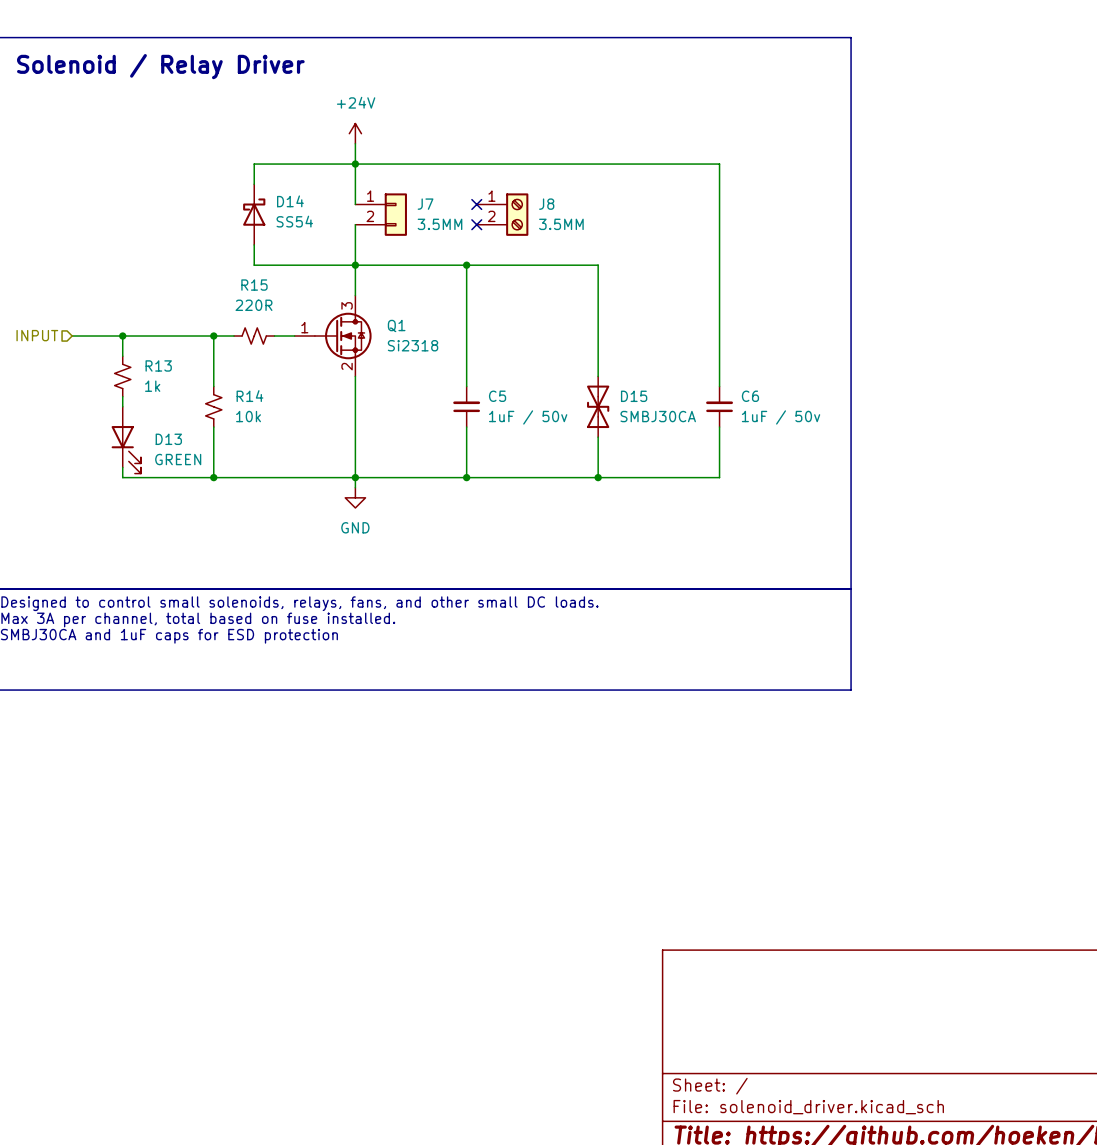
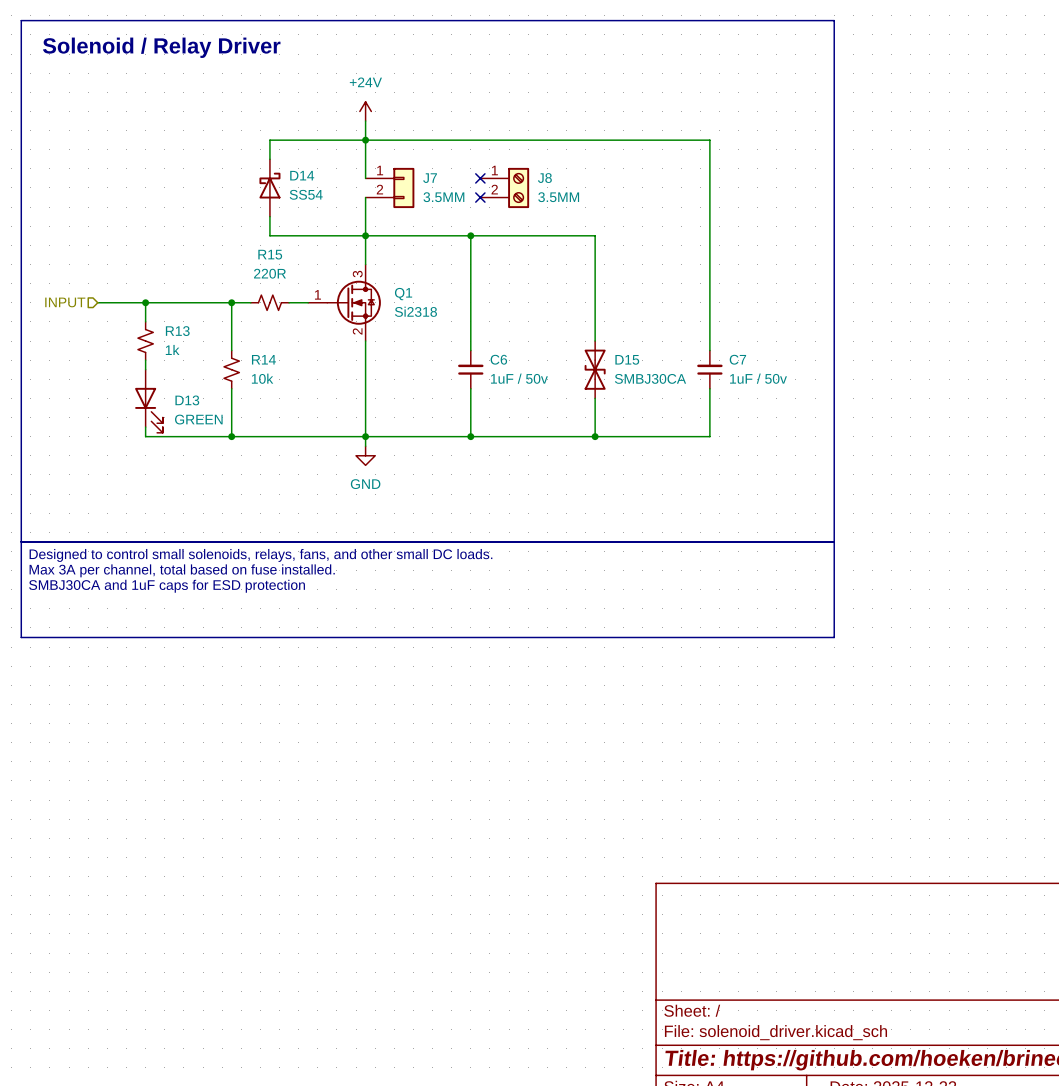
C5 name: C5 (497, 396) -> C6 (498, 359)
C6 name: C6 (750, 396) -> C7 (737, 359)

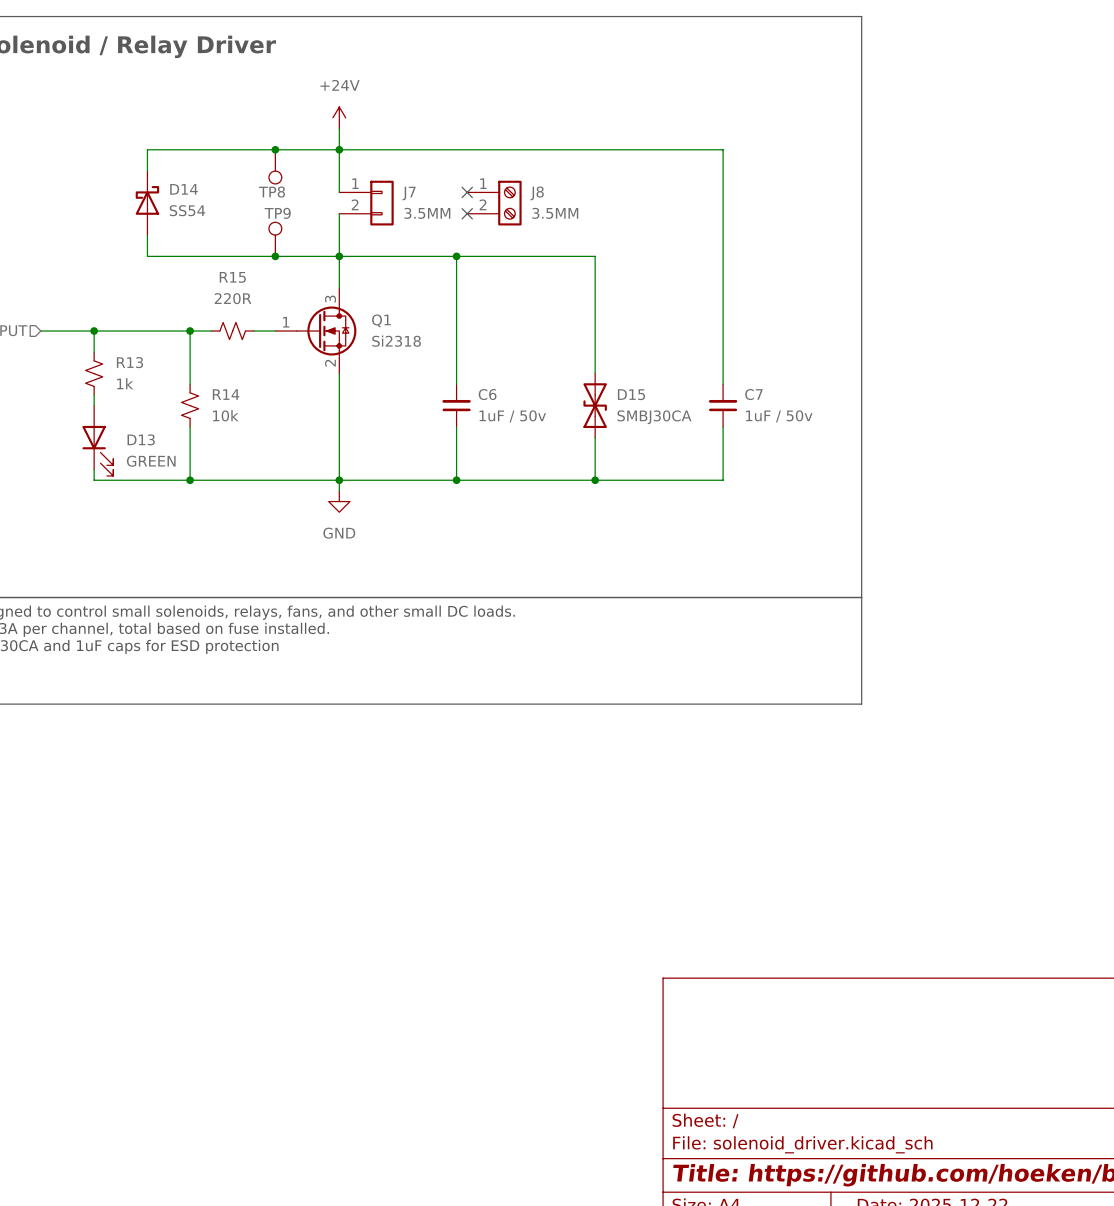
wire: (269, 140) (269, 159) -> (232, 149) (147, 149) (147, 171)
junction: none -> (275, 149)
TP8: none -> (275, 166)
D14 position: (269, 187) -> (147, 203)
wire: (269, 216) (269, 235) -> (147, 235) (147, 256) (232, 256)
TP9: none -> (275, 239)
junction: none -> (275, 256)

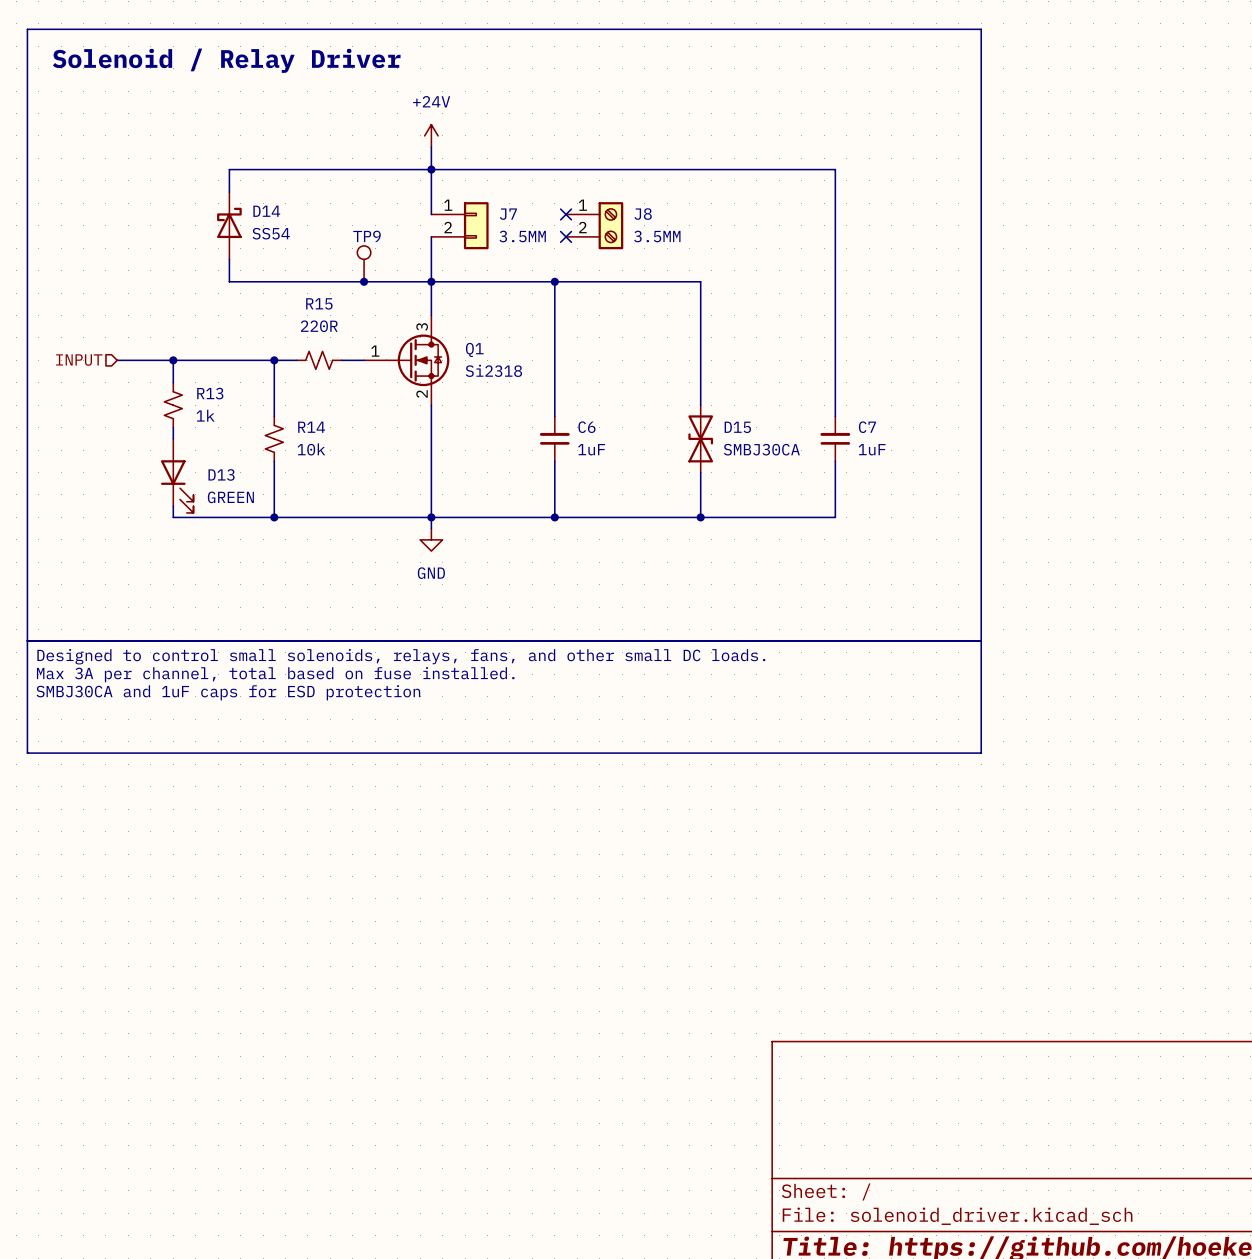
junction: (275, 149) -> none
TP8: (275, 166) -> none
C6 value: 1uF / 50v (512, 416) -> 1uF (591, 449)
C7 value: 1uF / 50v (779, 416) -> 1uF (872, 449)

